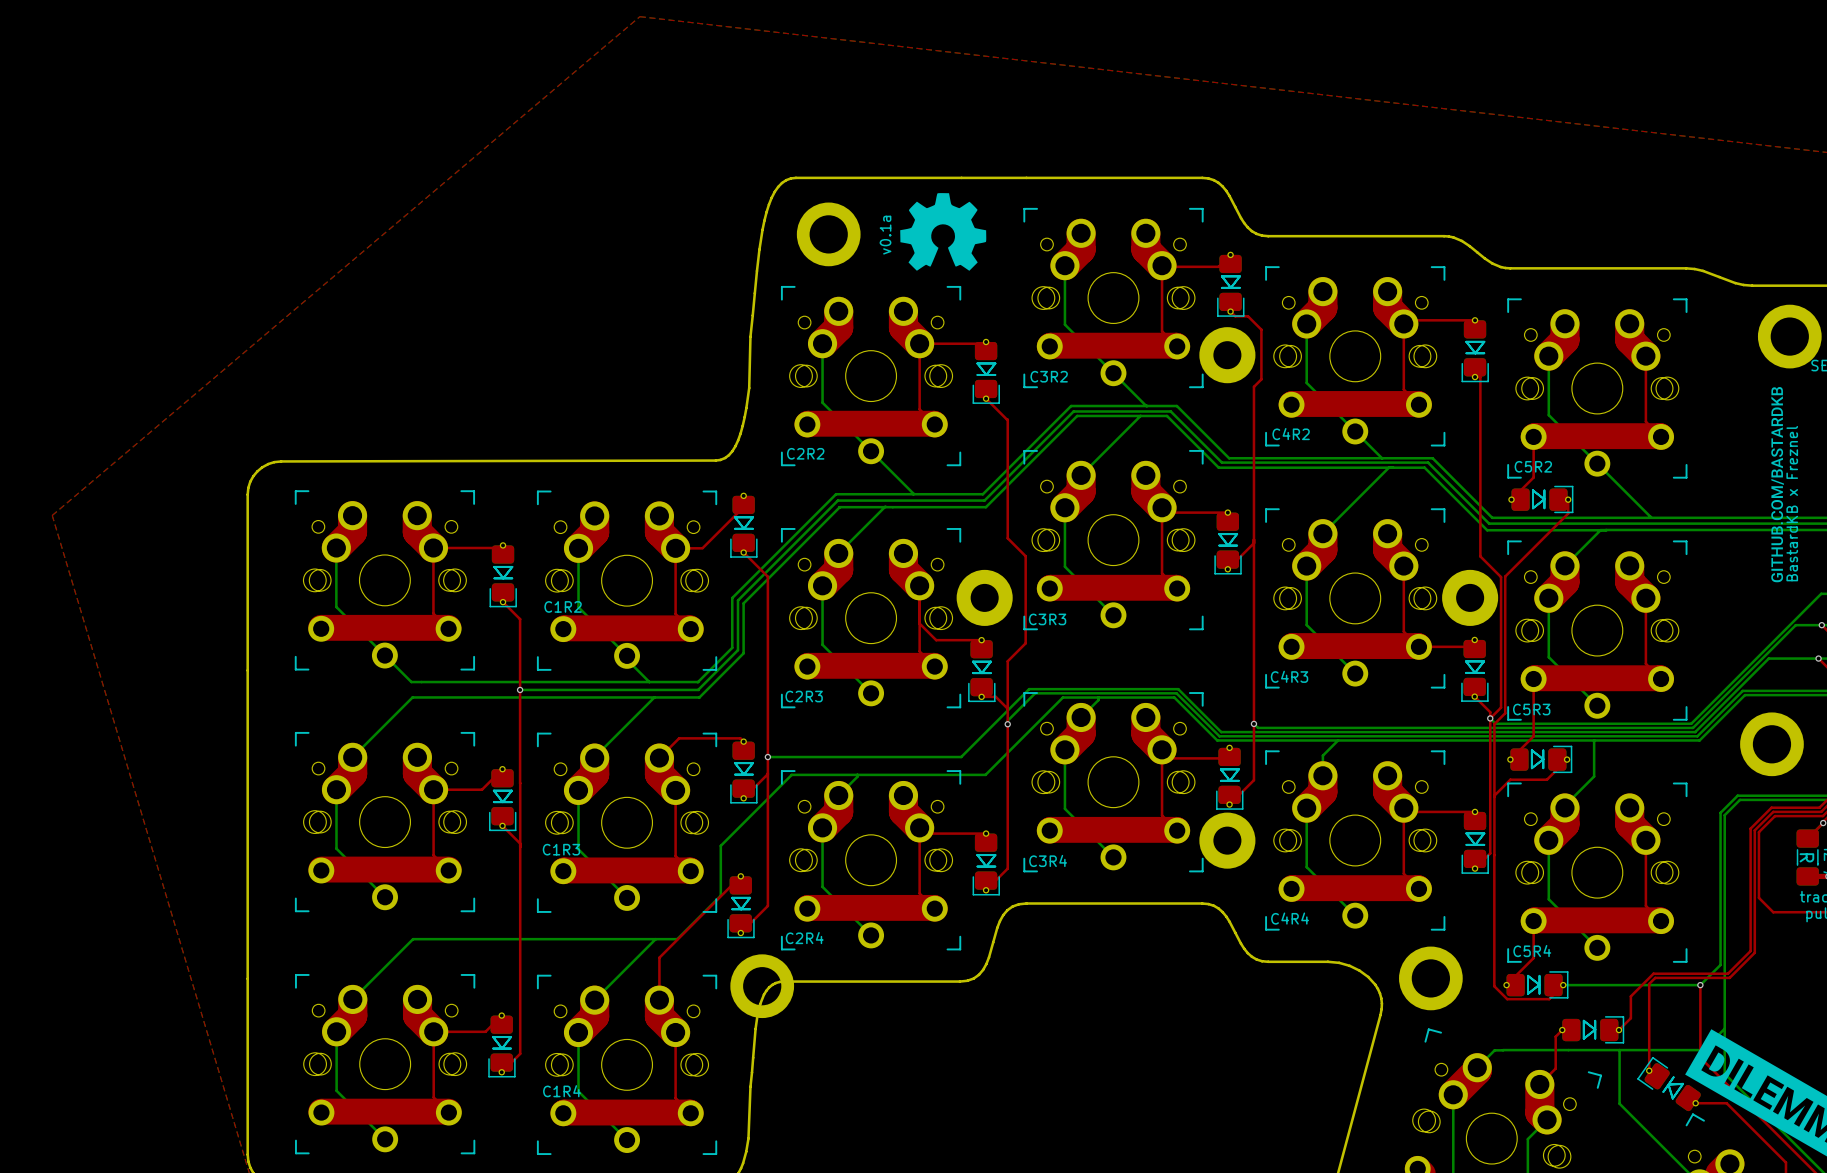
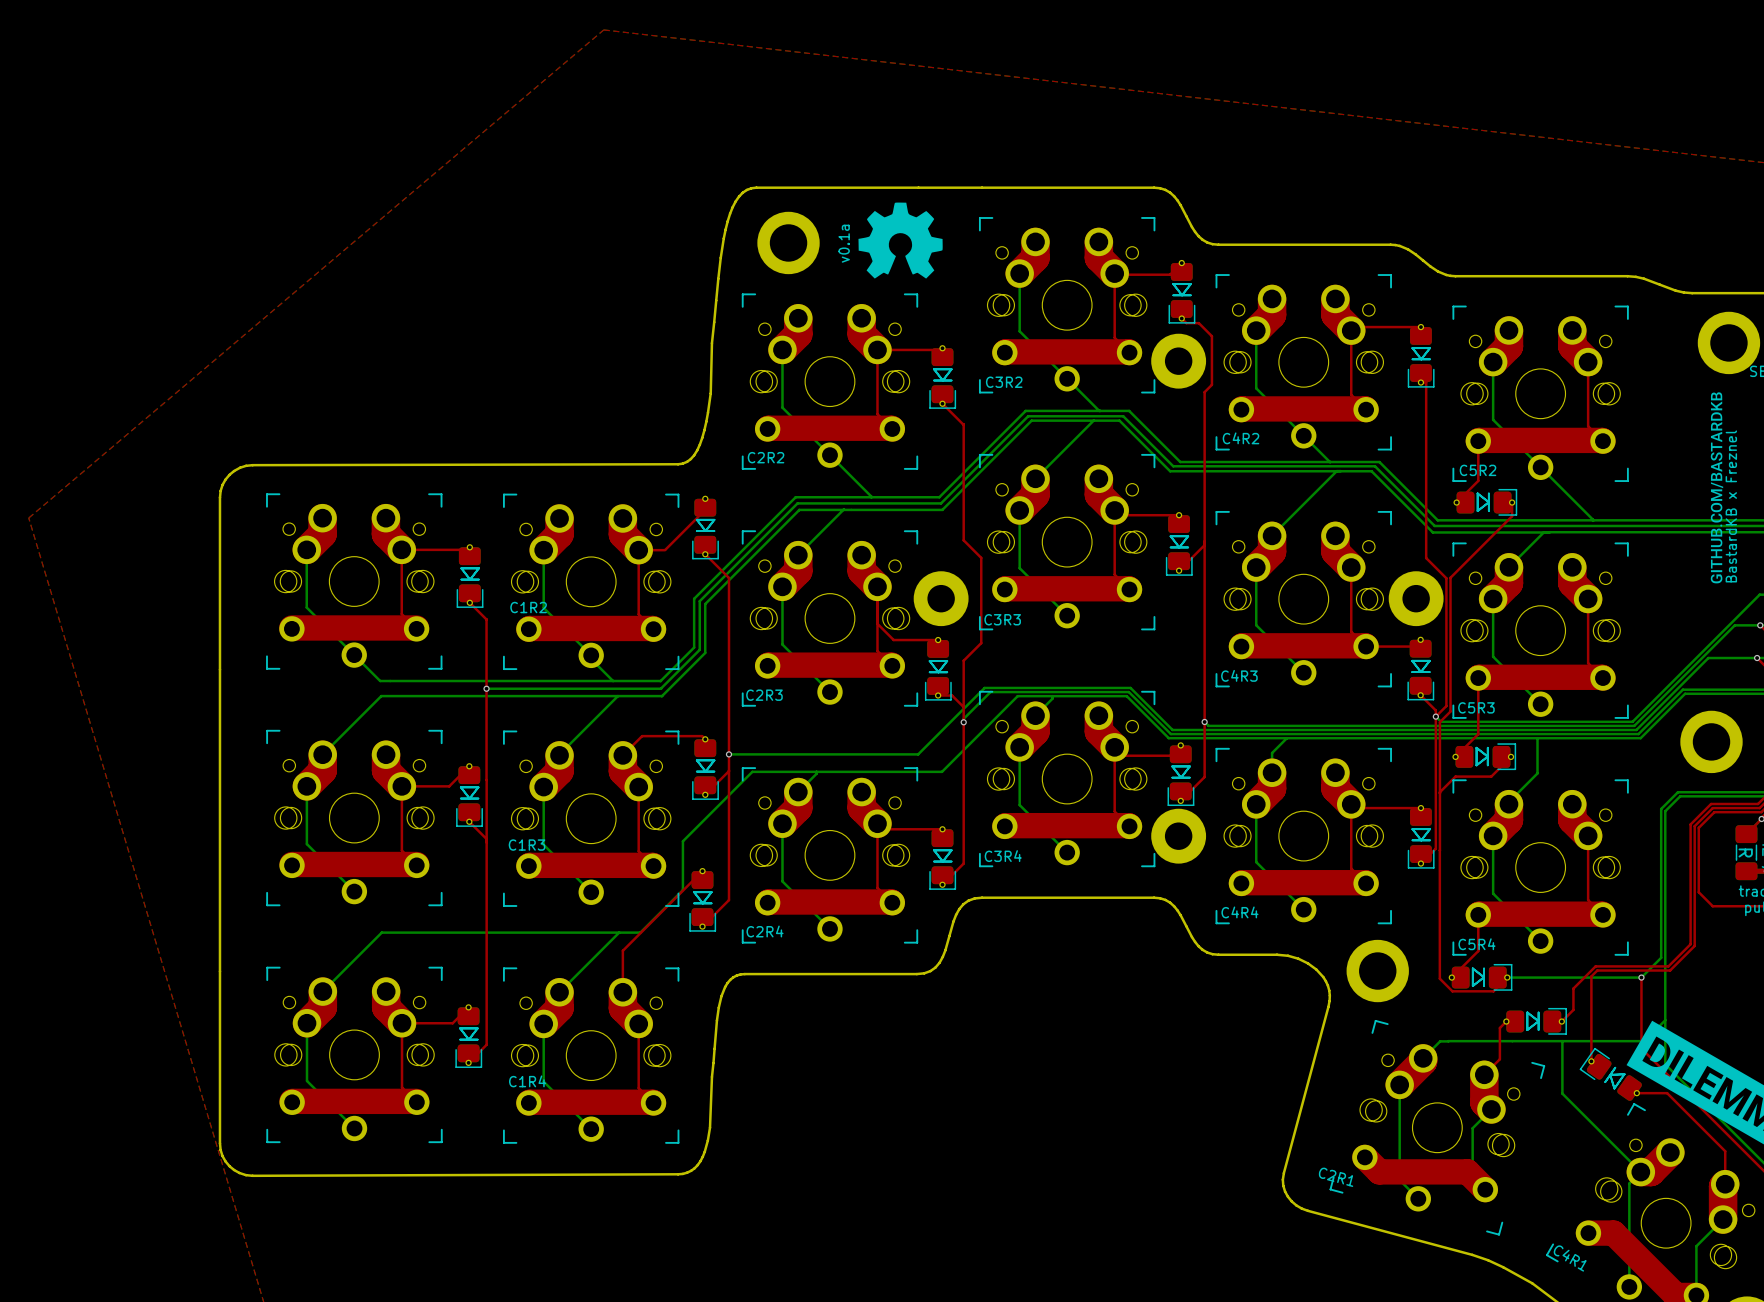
part: (762, 986) -> none

